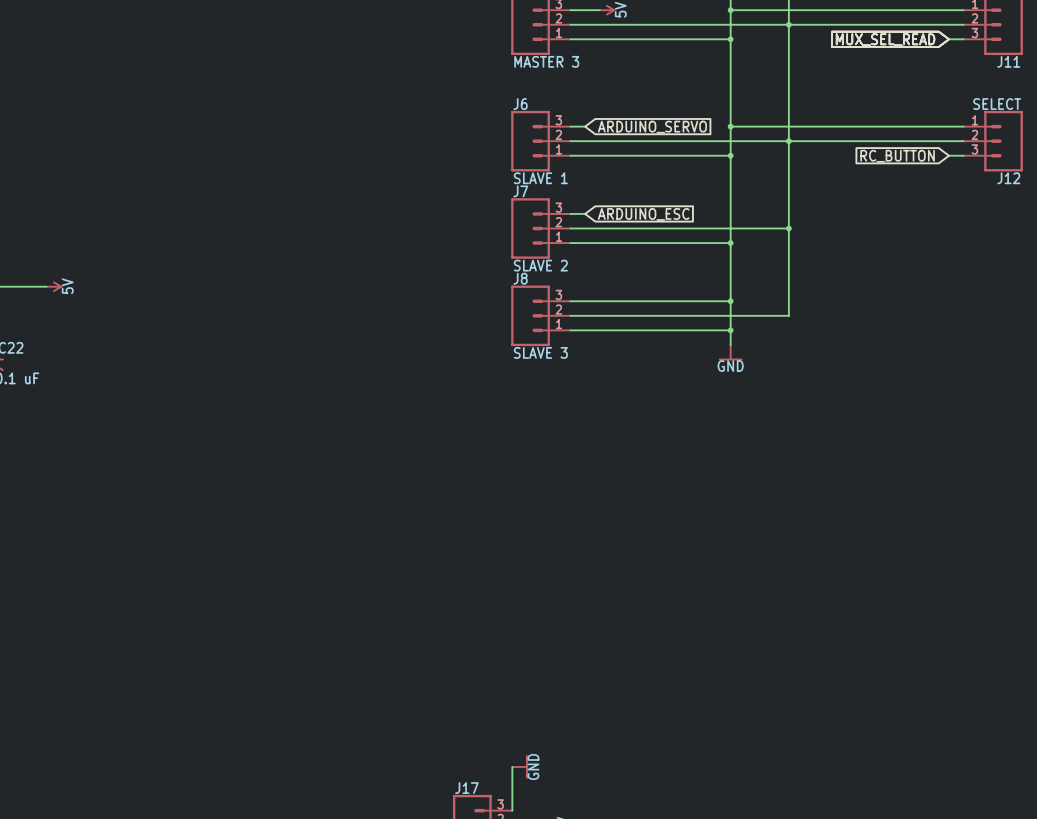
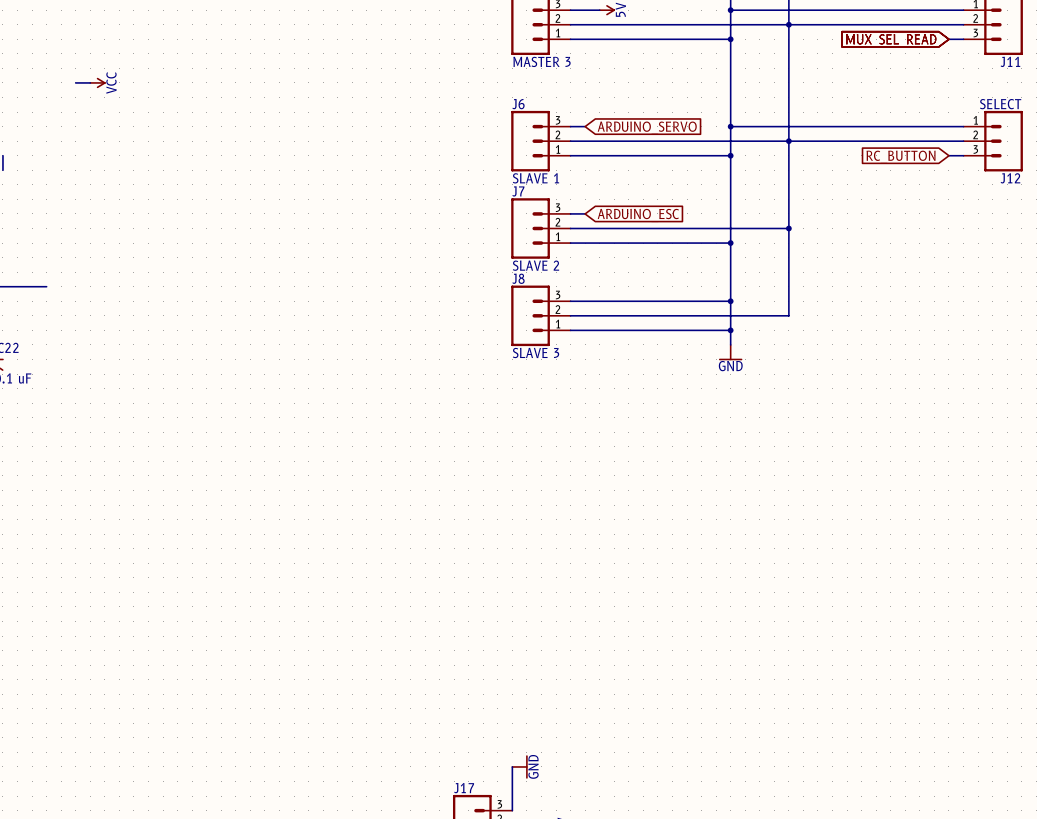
wire: none -> (75, 82) (90, 82)
power symbol: none -> VCC (97, 82)
wire: none -> (2, 155) (2, 170)
power symbol: 5V (54, 286) -> none

